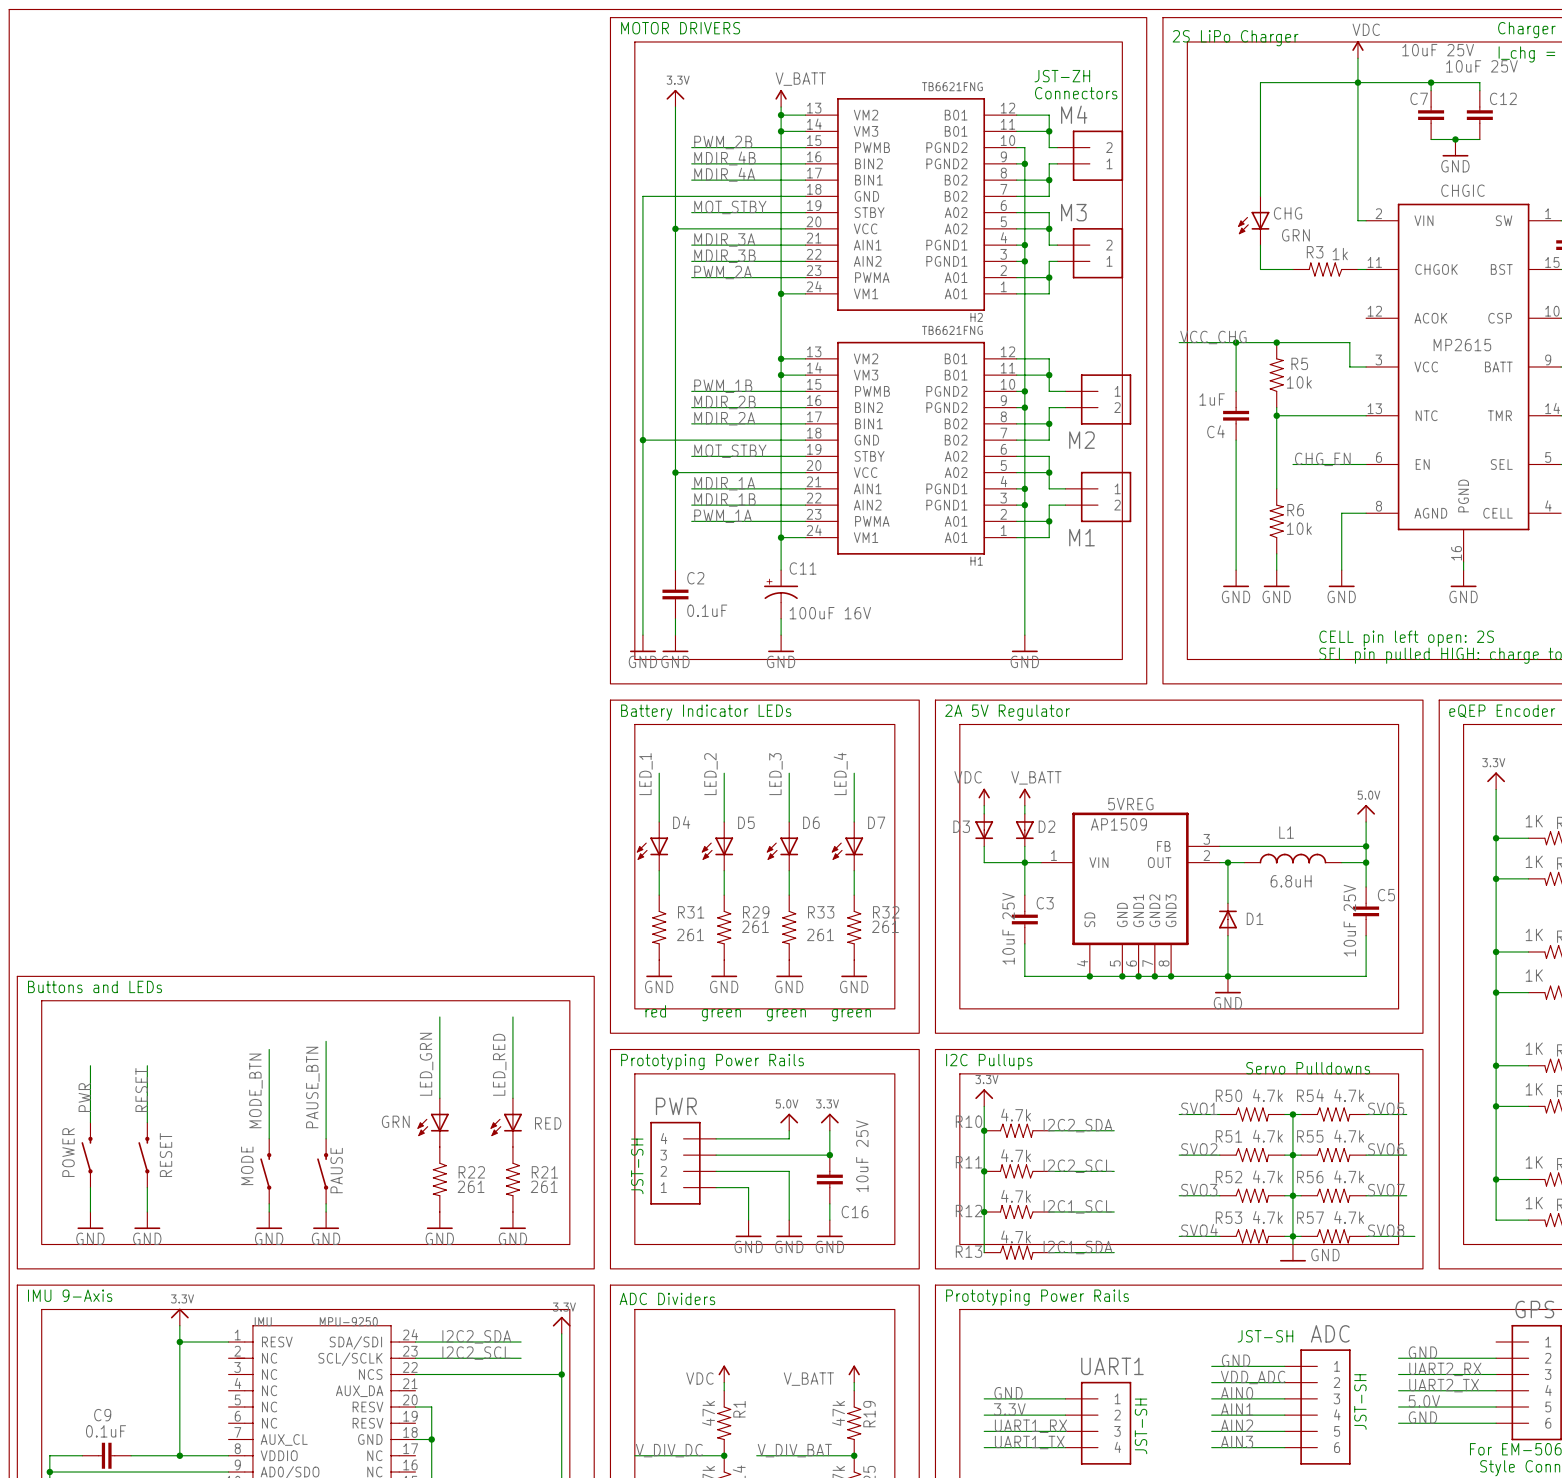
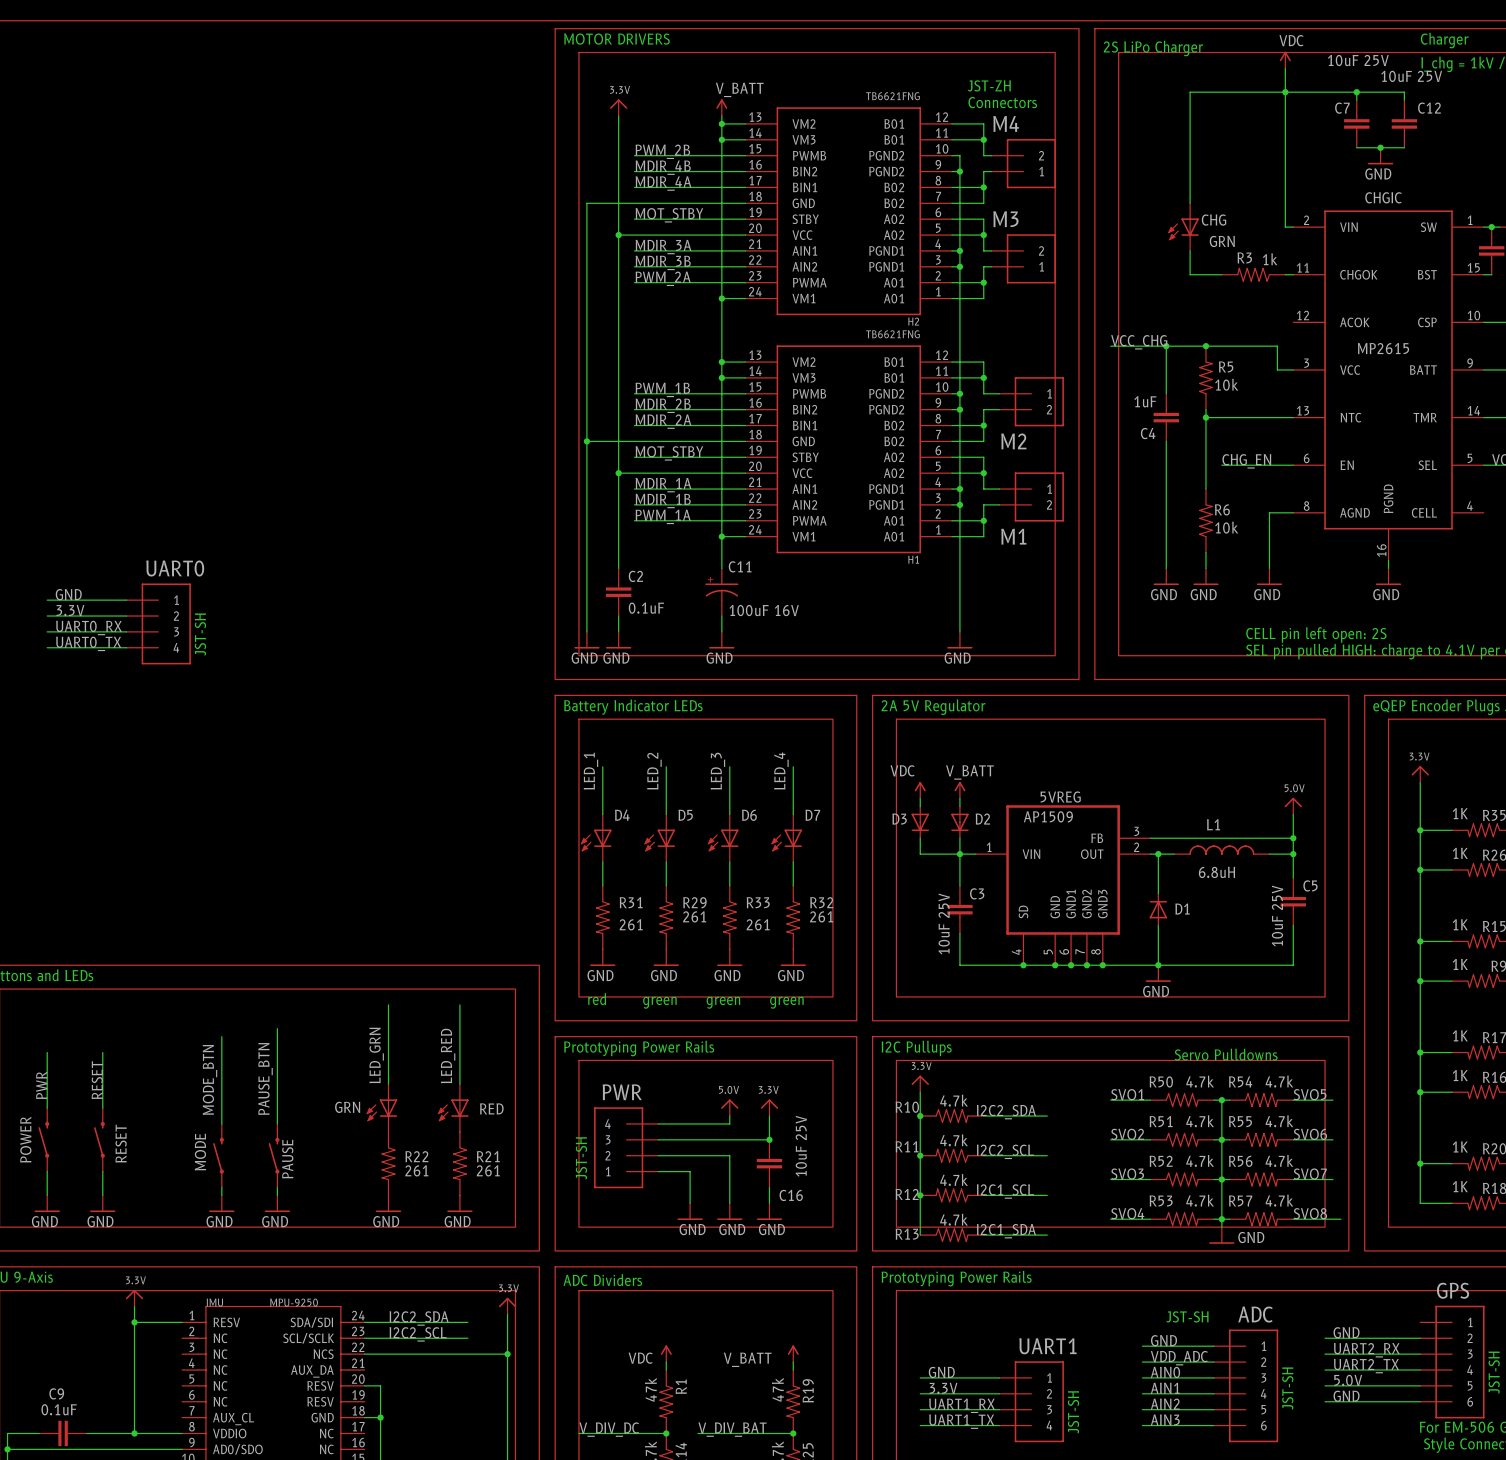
label: none -> GND (68, 594)
wire: none -> (47, 600) (126, 600)
label: none -> 3.3V (70, 610)
wire: none -> (47, 616) (126, 616)
UART0: none -> (158, 623)
label: none -> UART0_RX (88, 628)
text: none -> JST-SH (200, 634)
wire: none -> (47, 631) (126, 631)
label: none -> UART0_TX (88, 643)
wire: none -> (47, 647) (126, 647)

